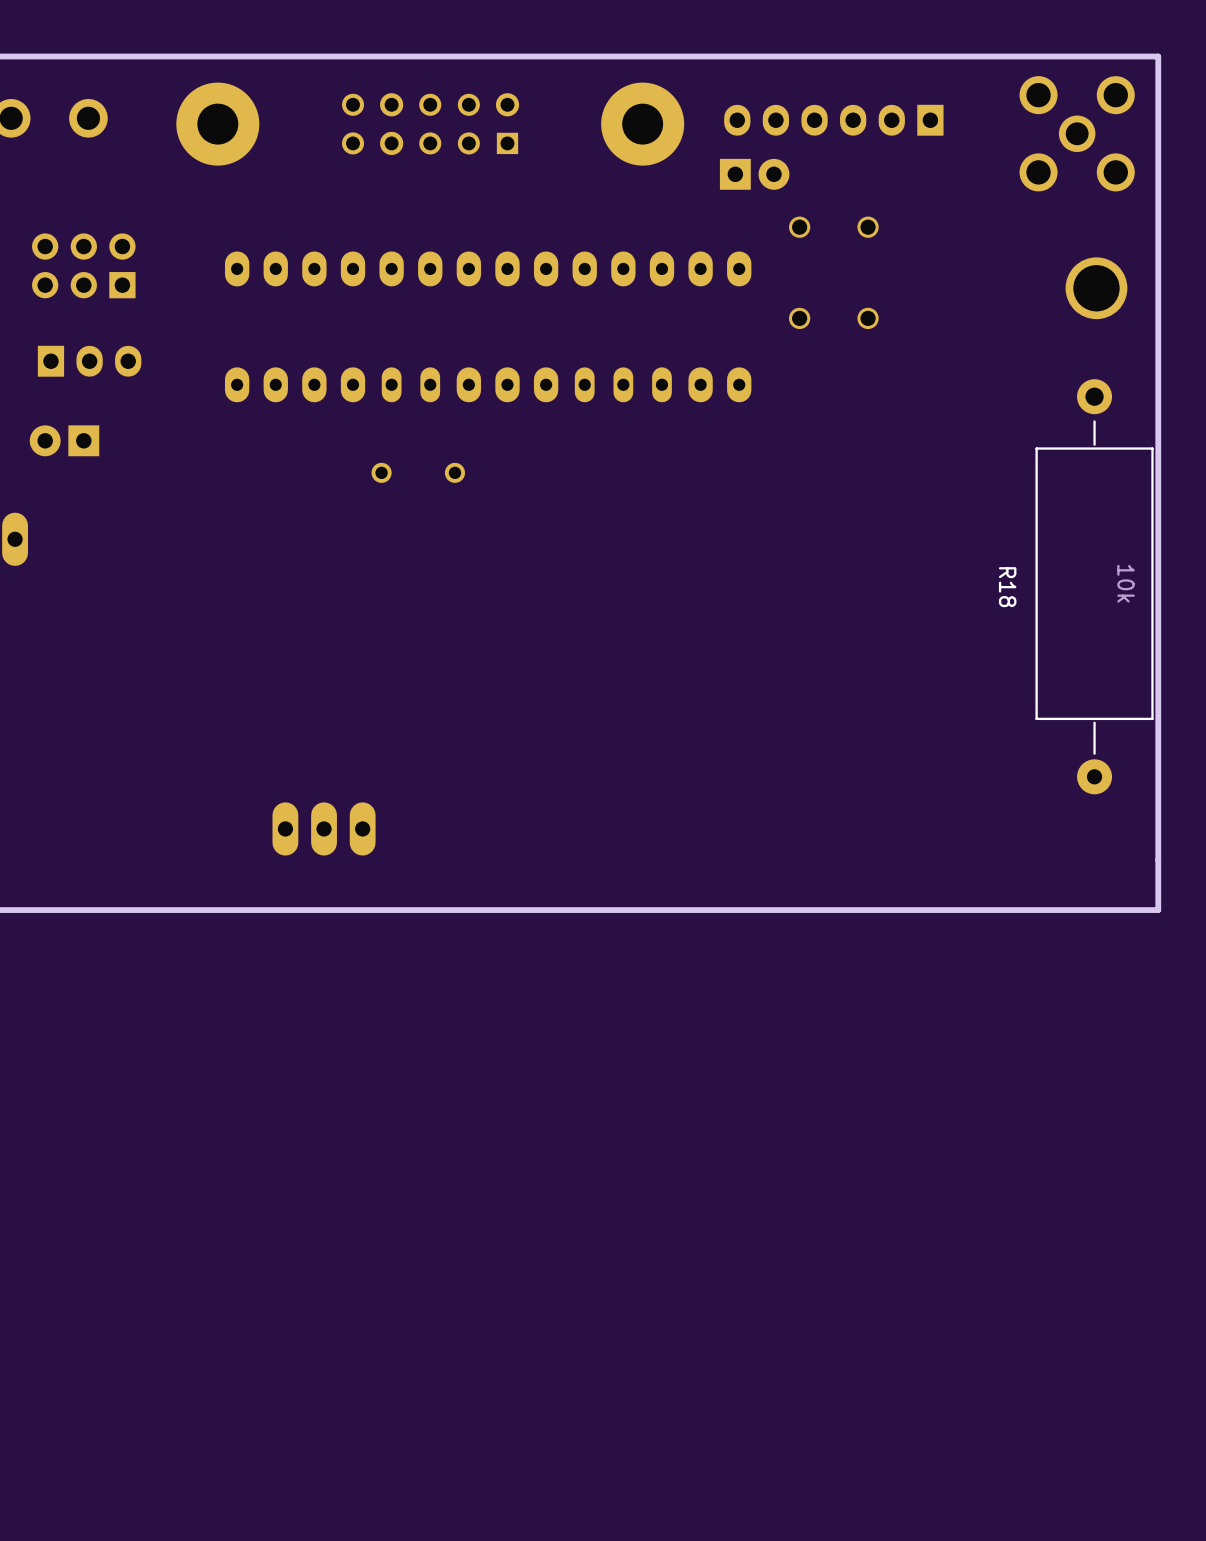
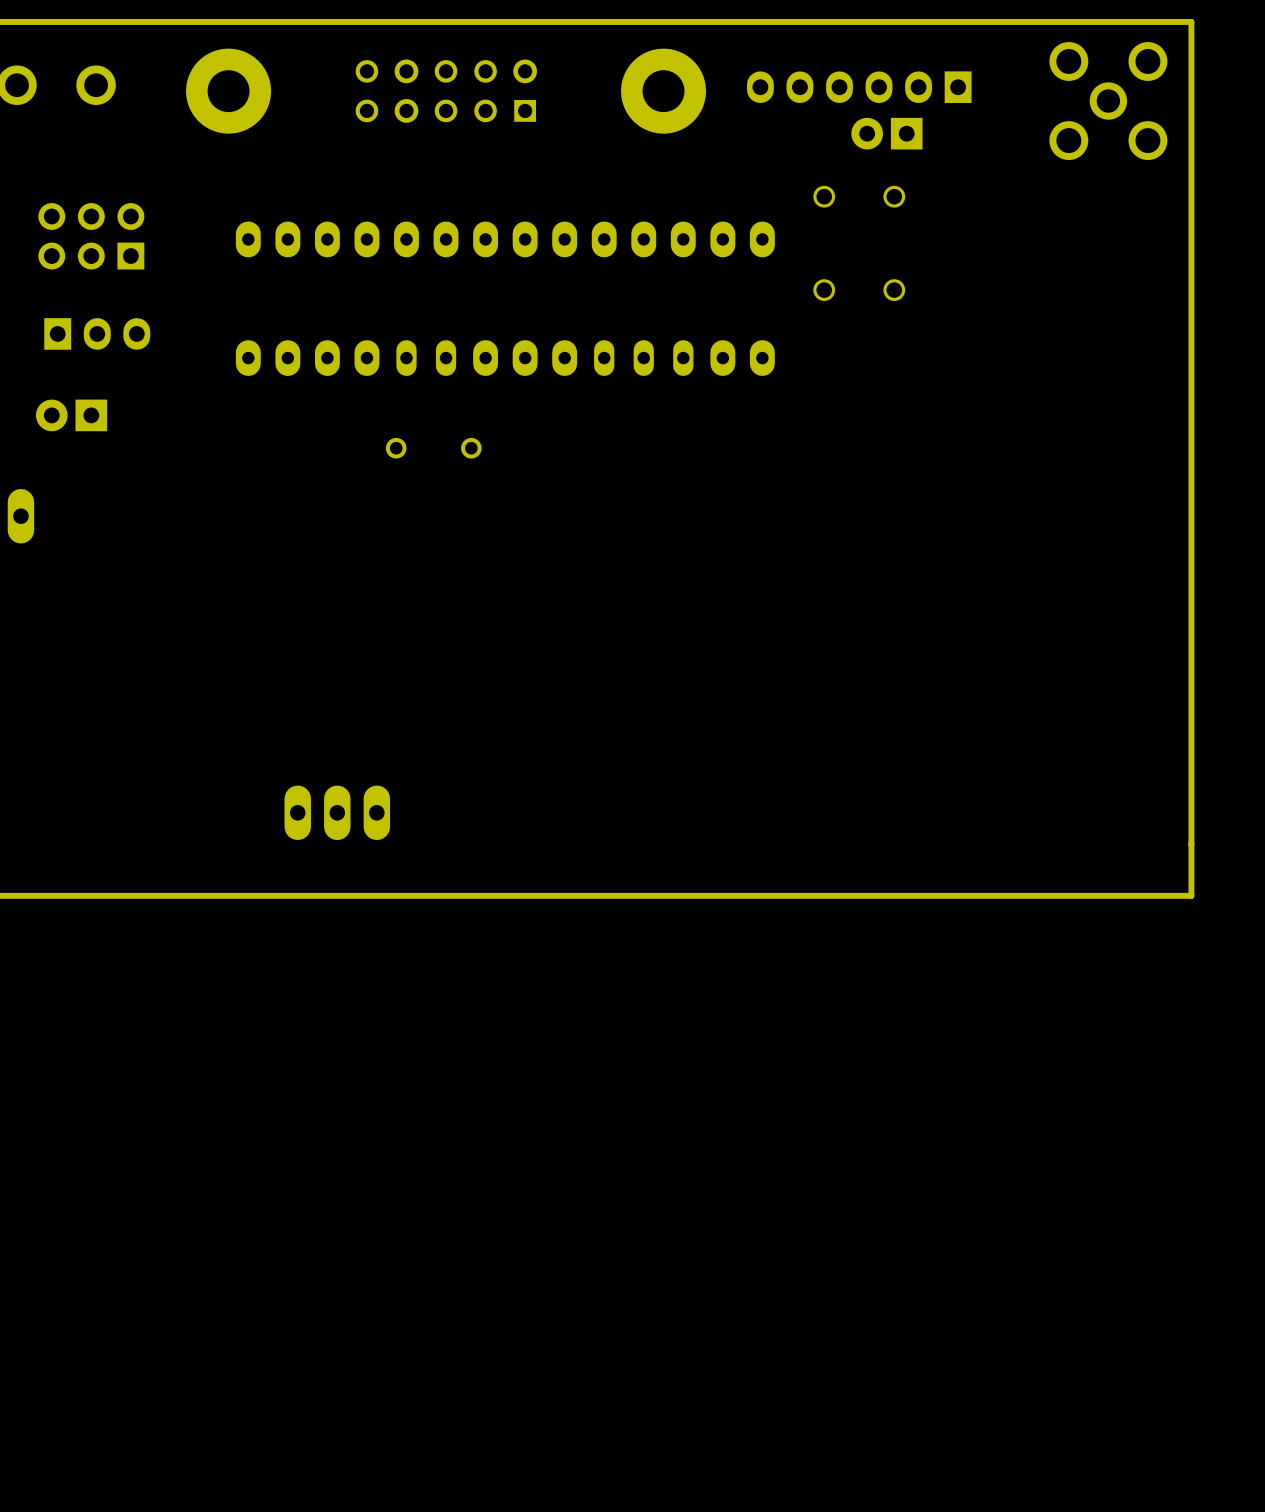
part rotation: 0° (754, 174) -> 180° (886, 133)
part position: (754, 174) -> (886, 133)
part: (1096, 288) -> none
R18: 10k (1094, 586) -> none

